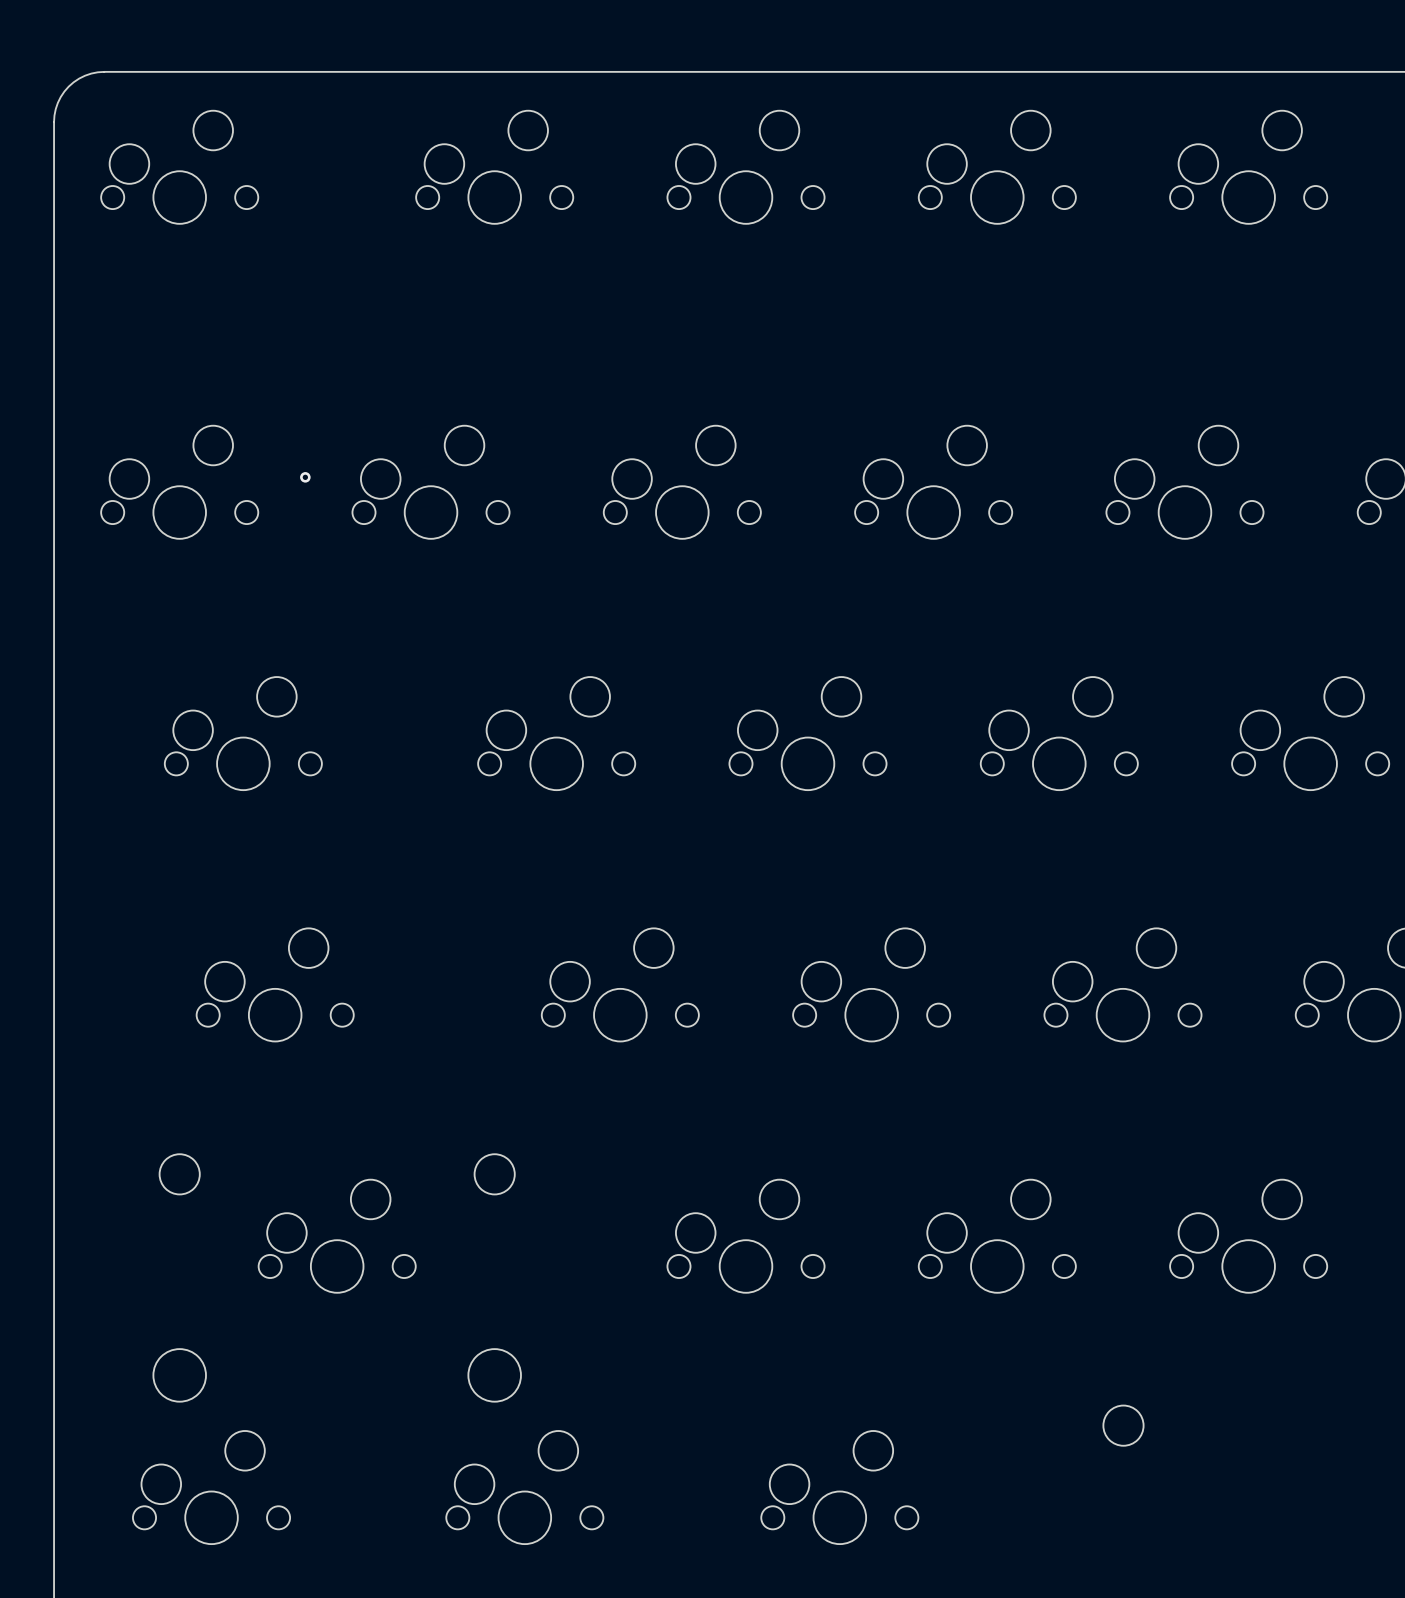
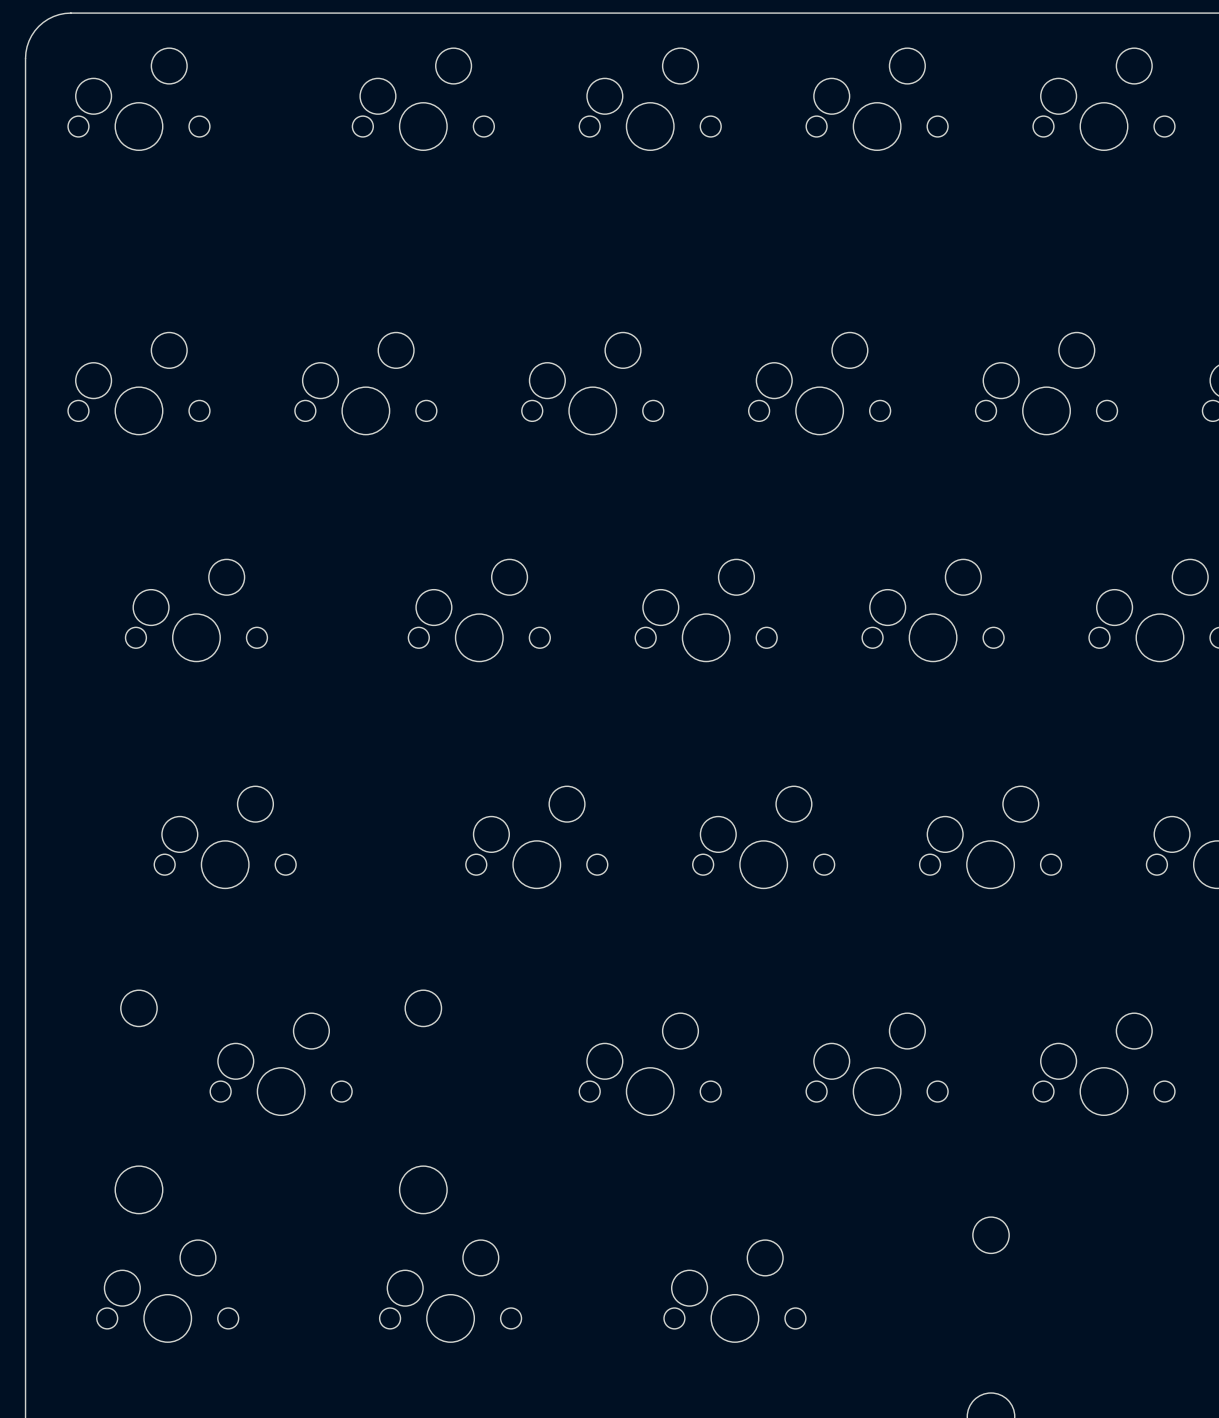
via: (305, 477) -> none

